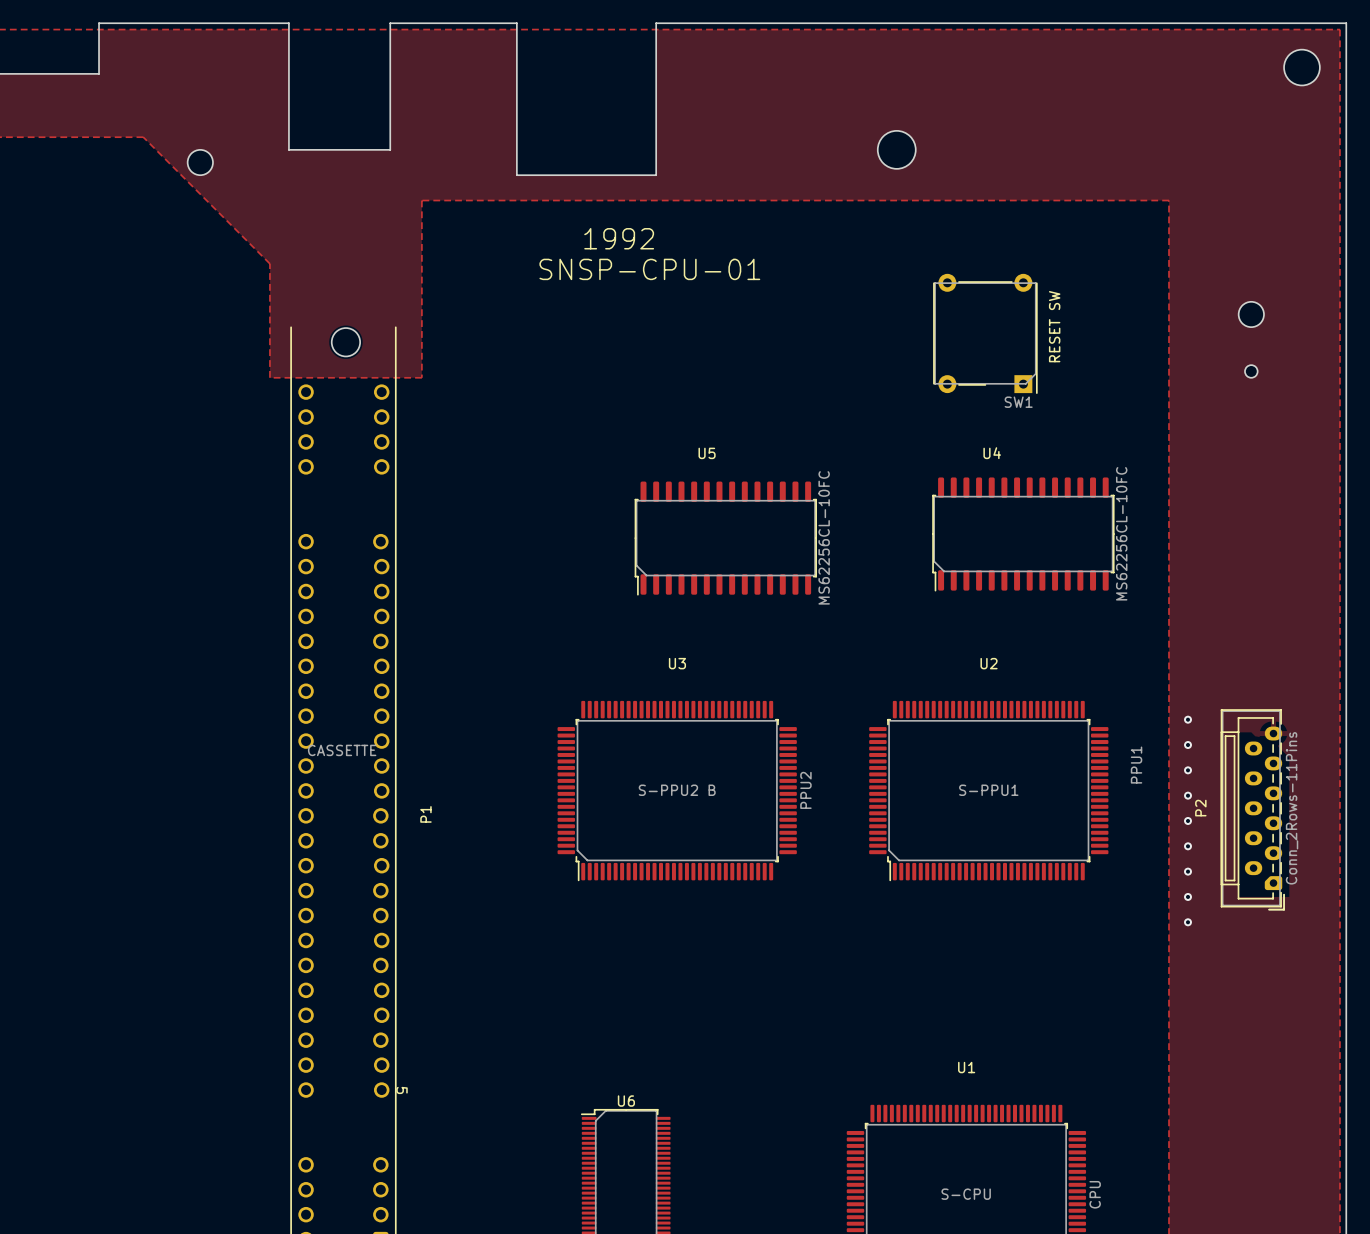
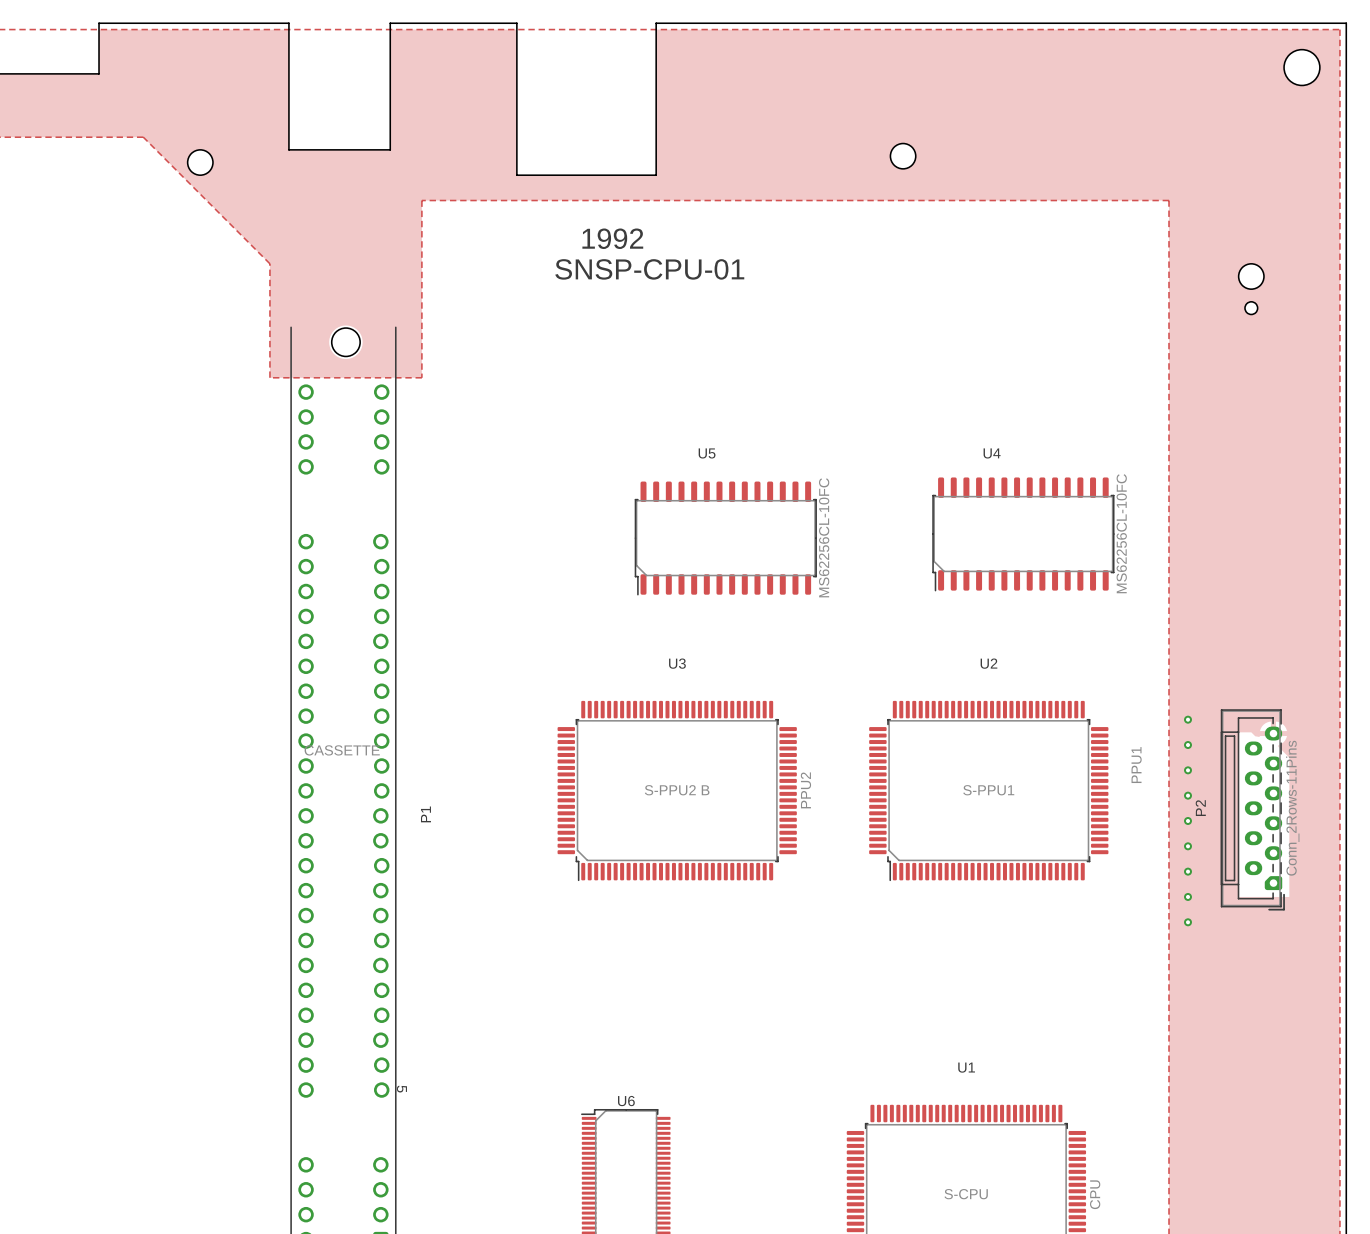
round board edge size: [877, 130, 917, 170] -> [889, 143, 917, 170]
round board edge: none -> [1244, 301, 1259, 315]
round board edge position: (1251, 314) -> (1251, 276)
SW1: RESET SW (985, 333) -> none
round board edge: [1244, 364, 1259, 379] -> none

